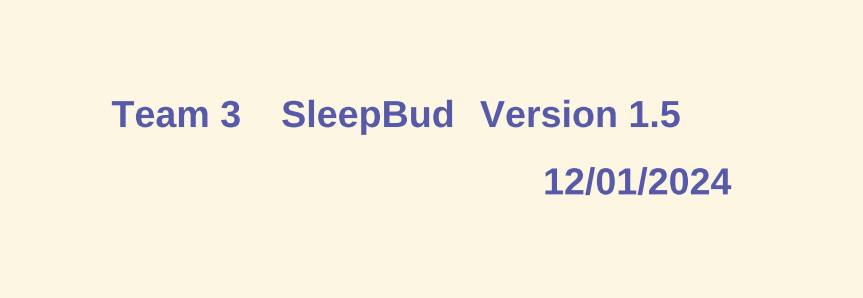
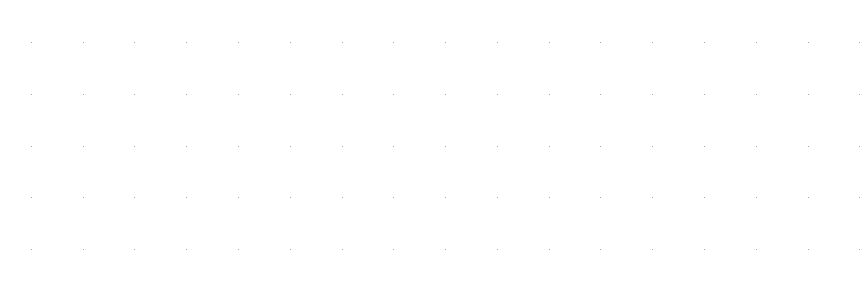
text: Version 1.5 (579, 113) -> none
text: Team 3 (175, 114) -> none
text: SleepBud (367, 117) -> none
text: 12/01/2024 (638, 181) -> none

